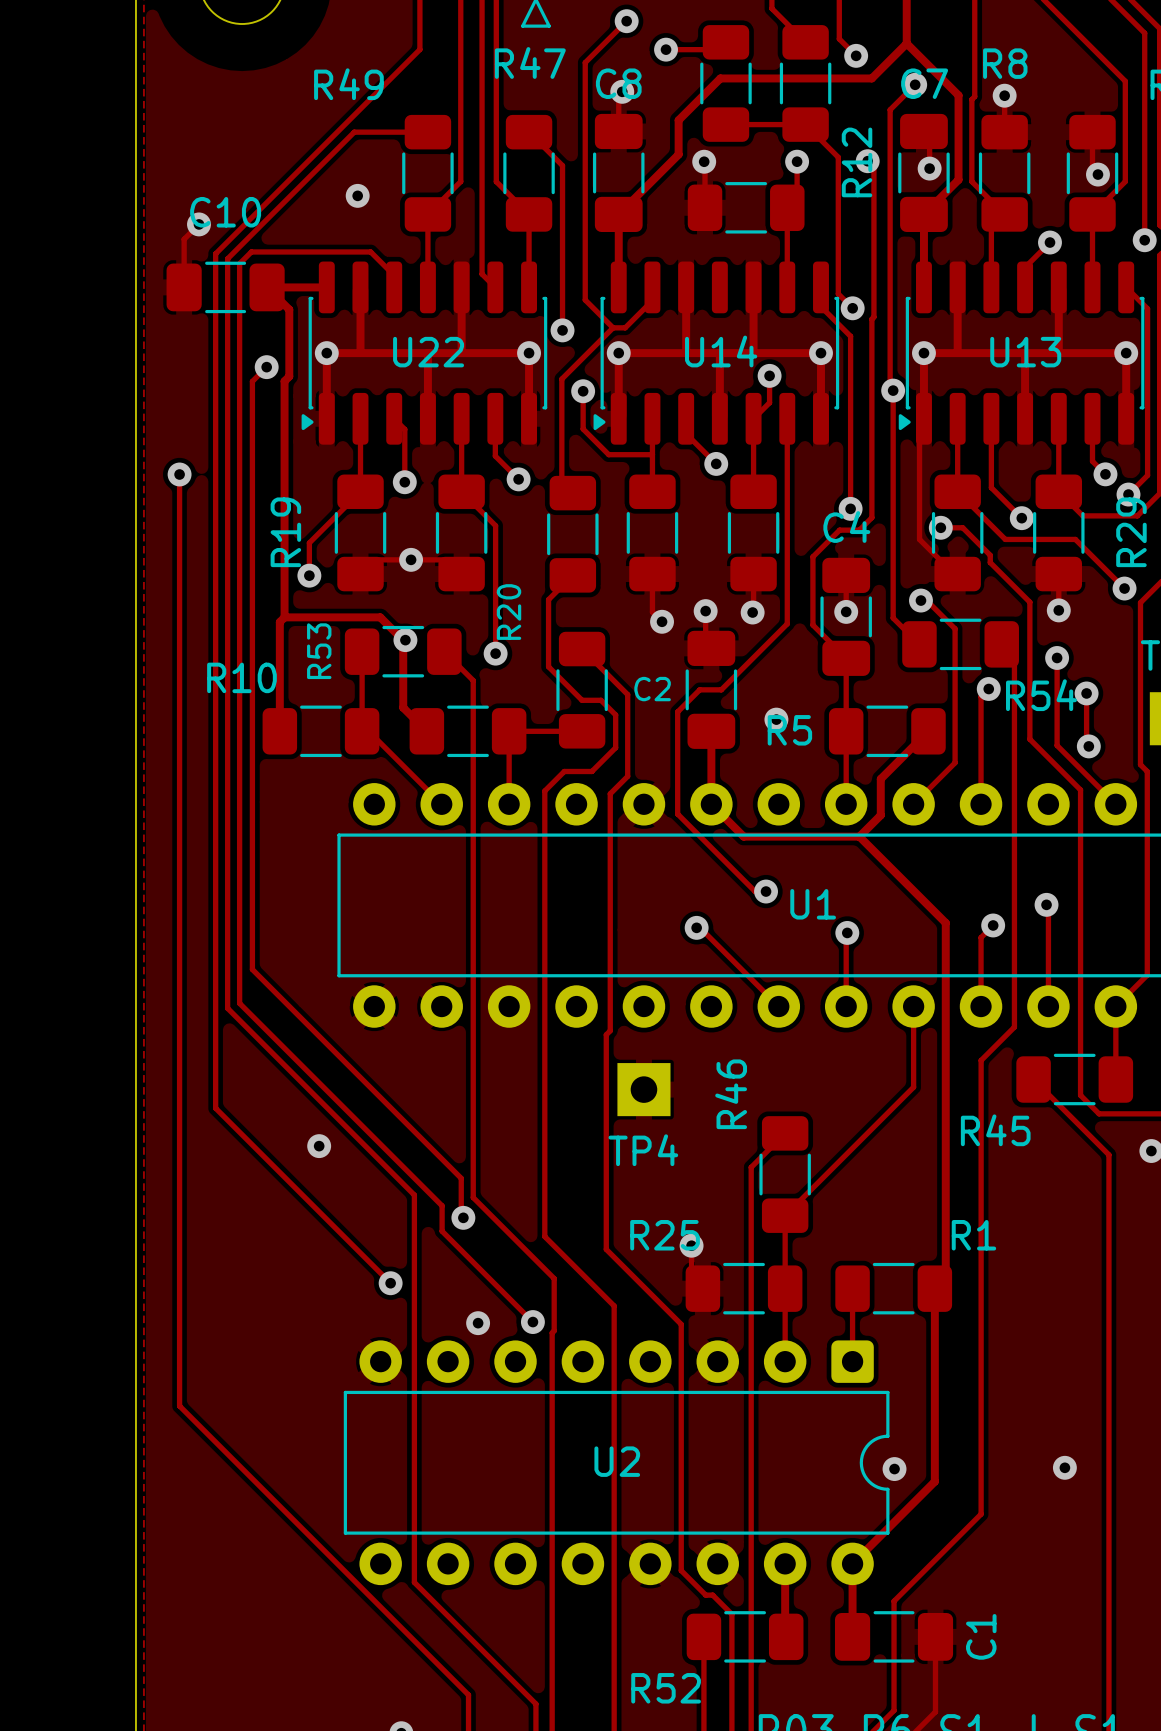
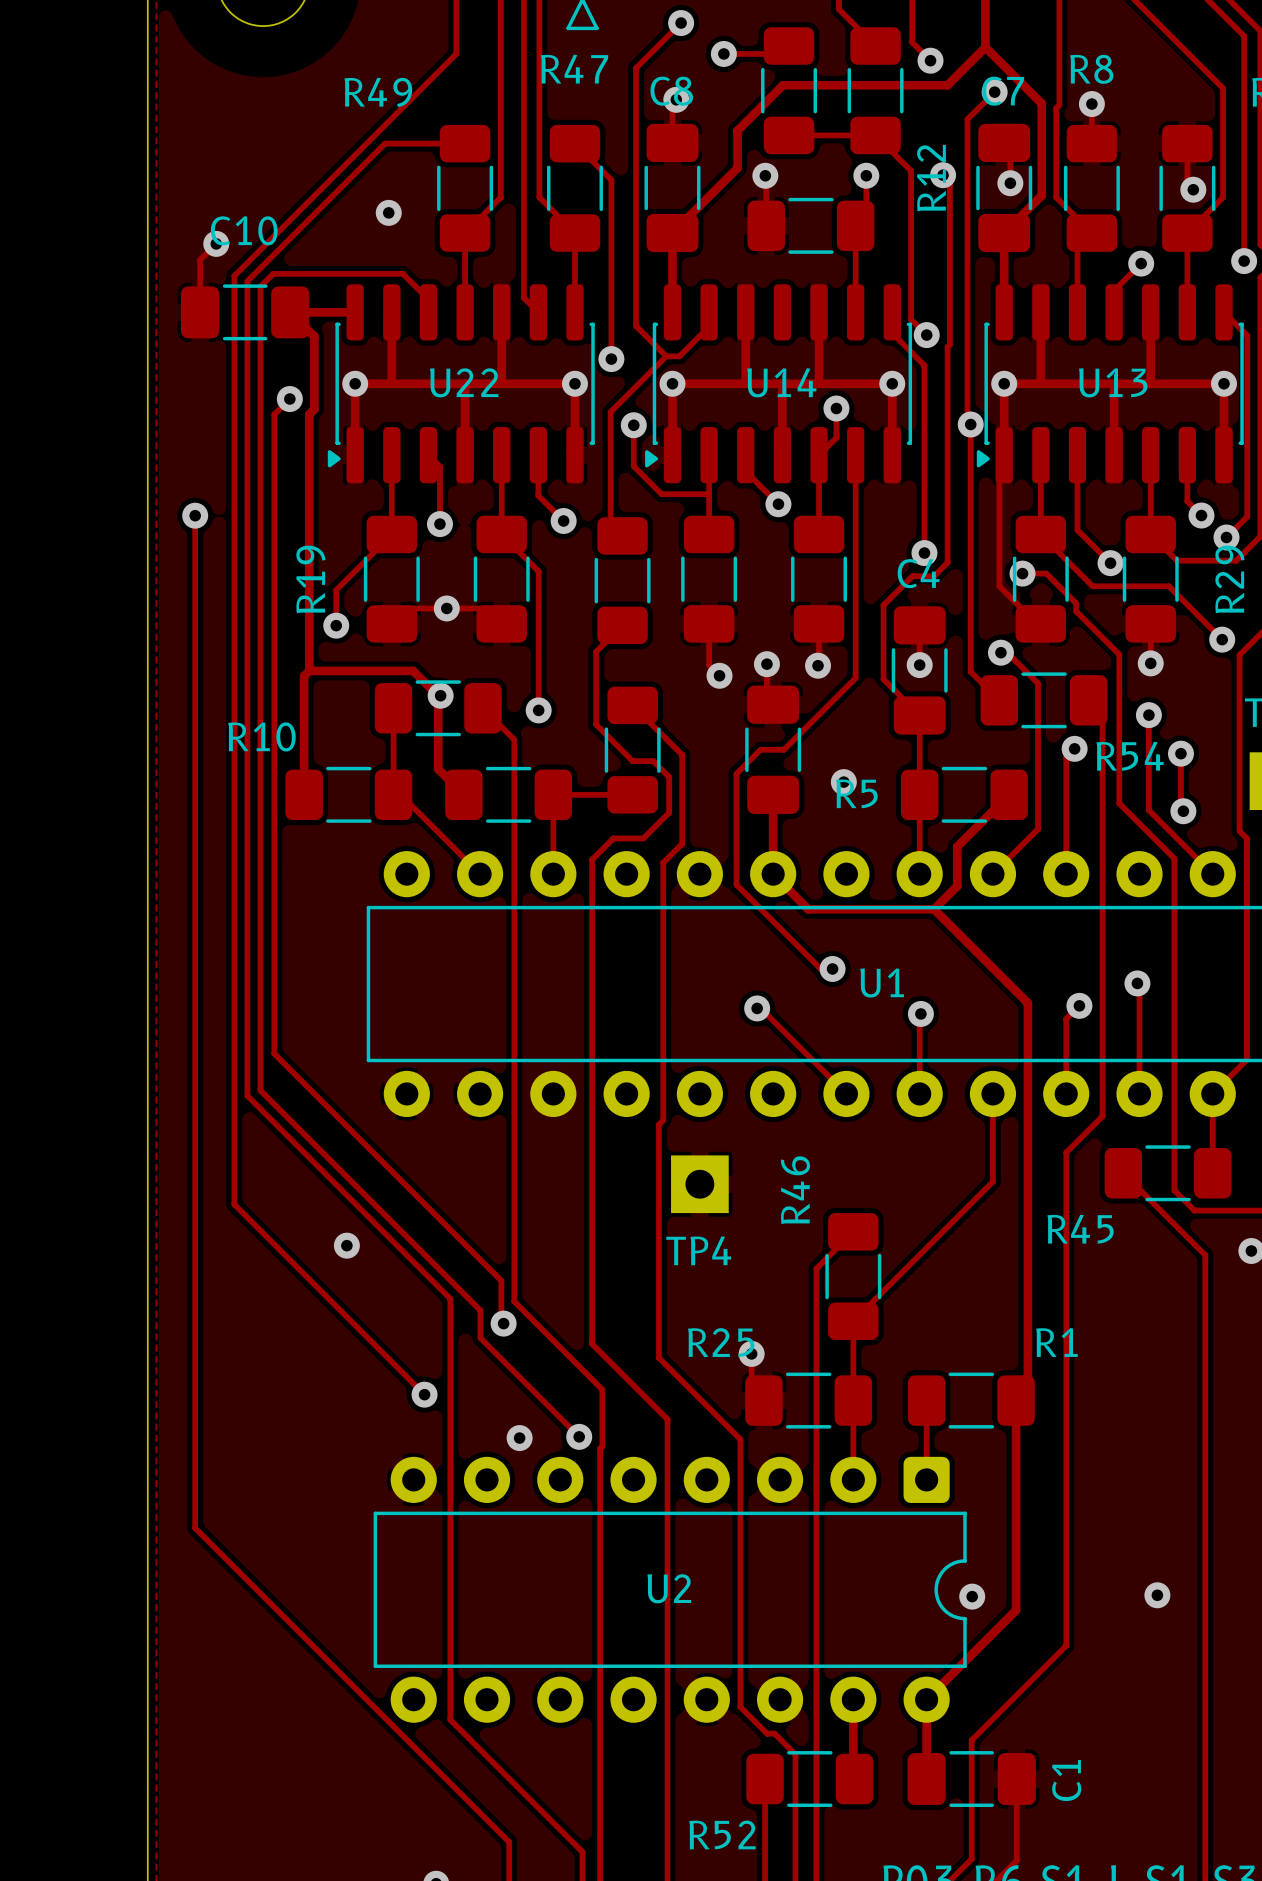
R20 name: R20 (509, 612) -> none
R53 name: R53 (319, 651) -> none
C2 name: C2 (652, 689) -> none

